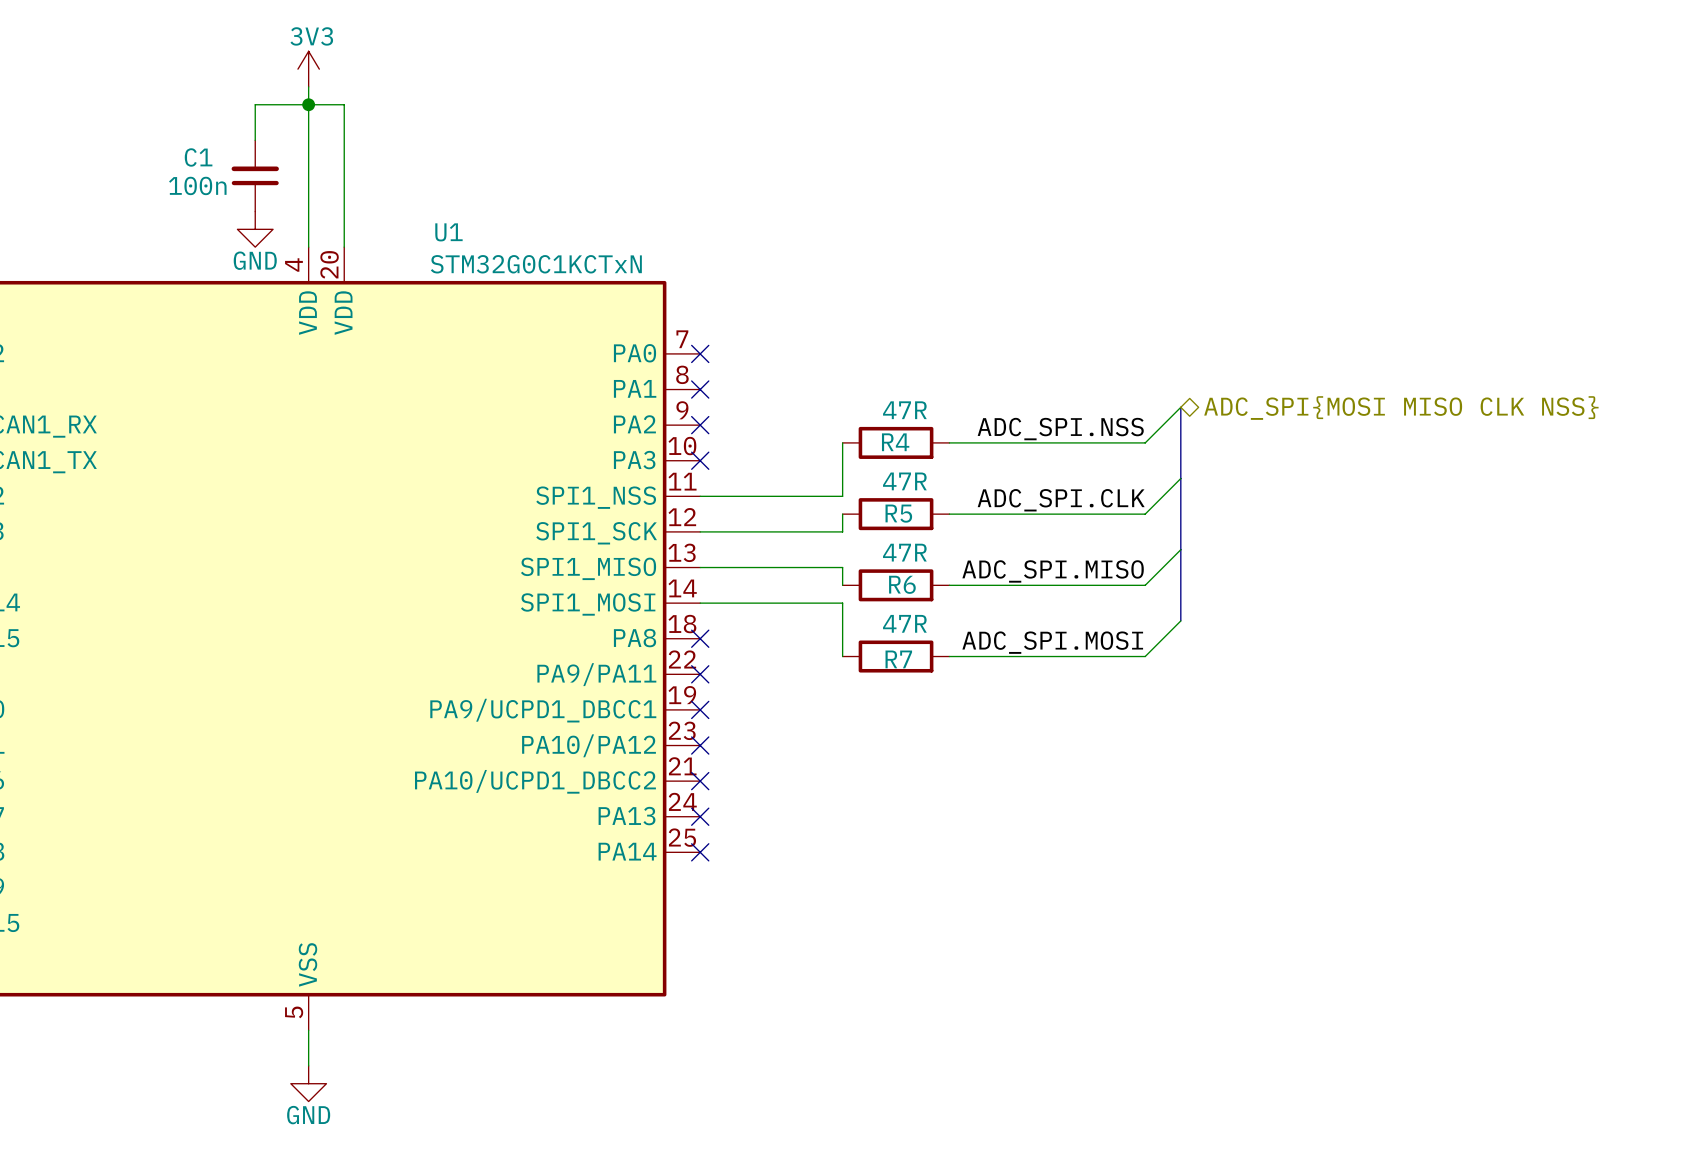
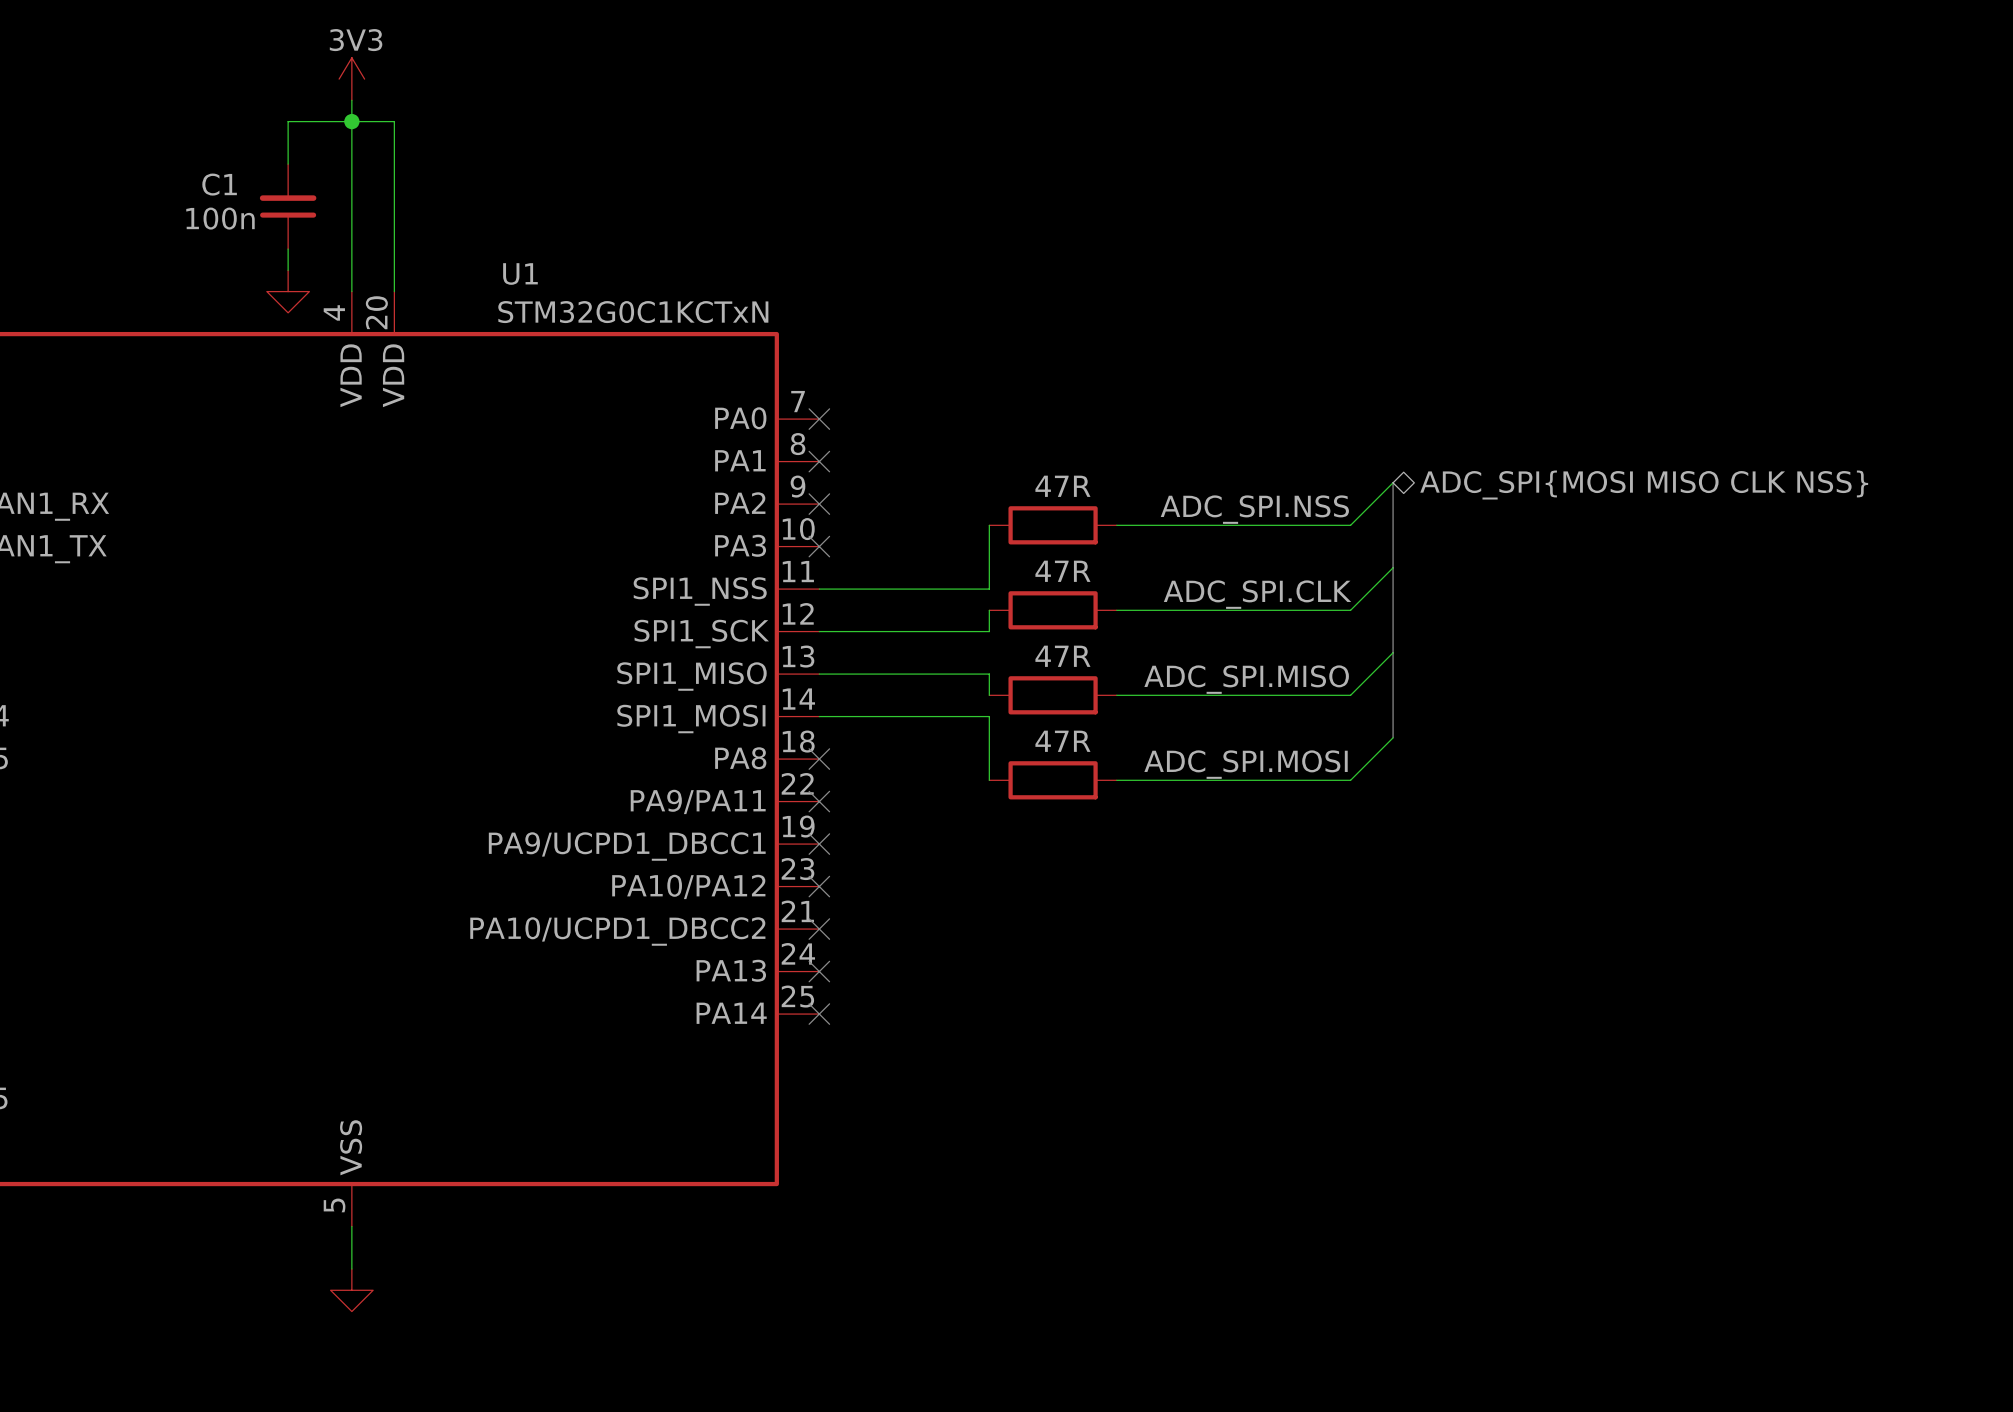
power symbol: GND (255, 229) -> none
power symbol: none -> (288, 291)
R4 name: R4 (895, 442) -> none
R5 name: R5 (898, 513) -> none
R6 name: R6 (902, 584) -> none
R7 name: R7 (898, 659) -> none
power symbol text: GND (308, 1115) -> none

